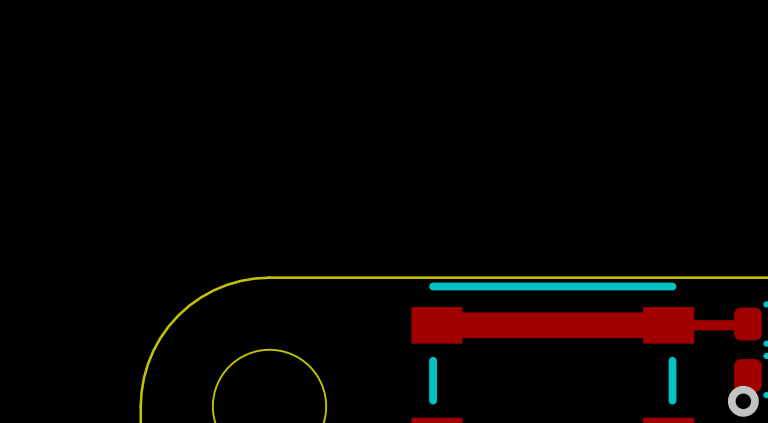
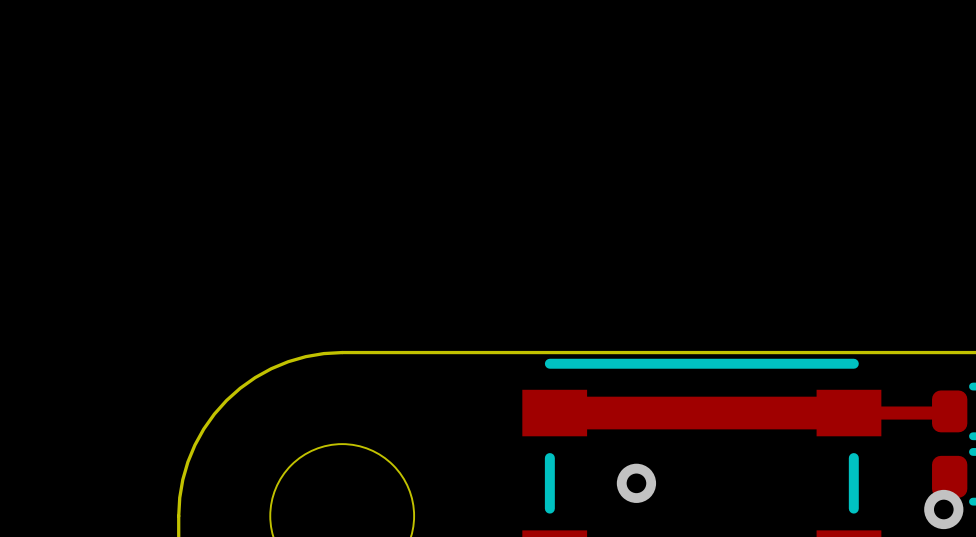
via: none -> (636, 483)

